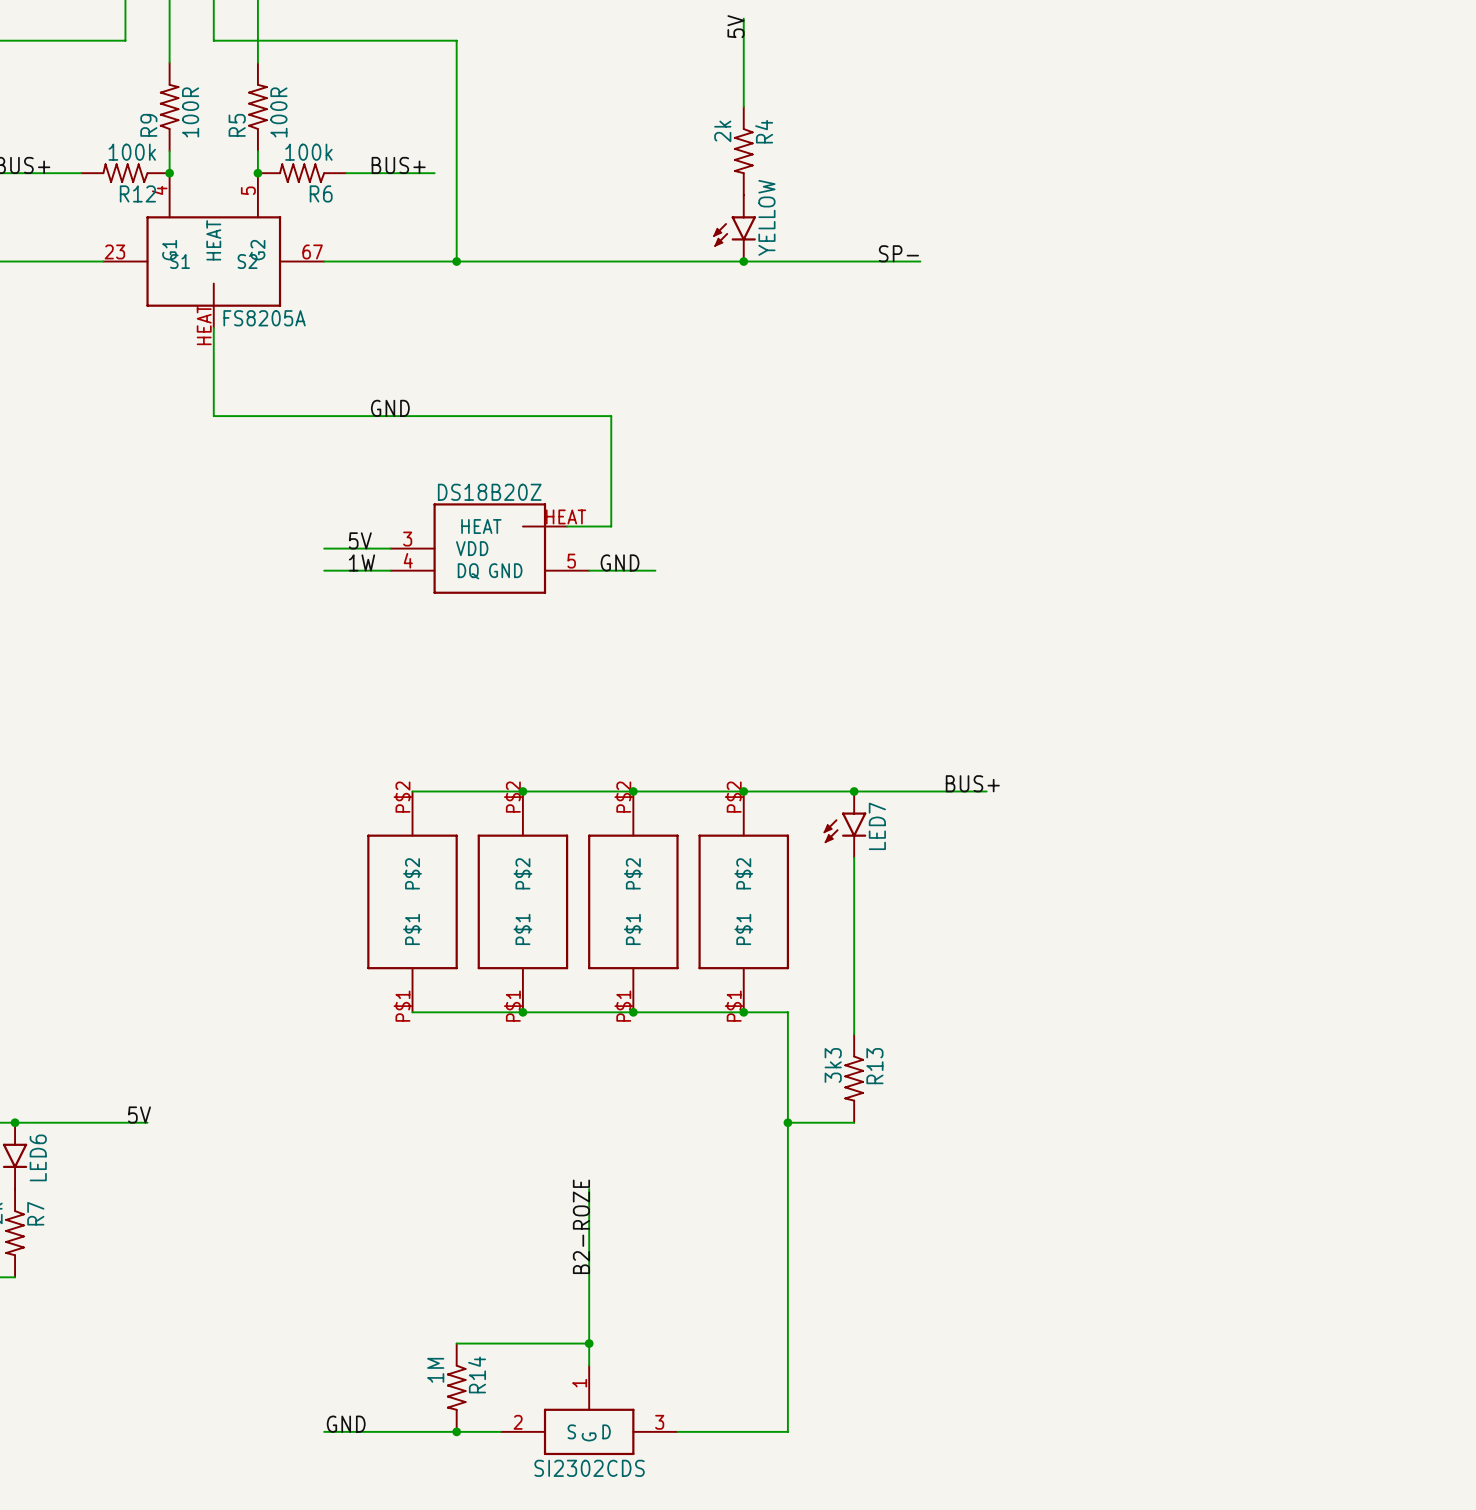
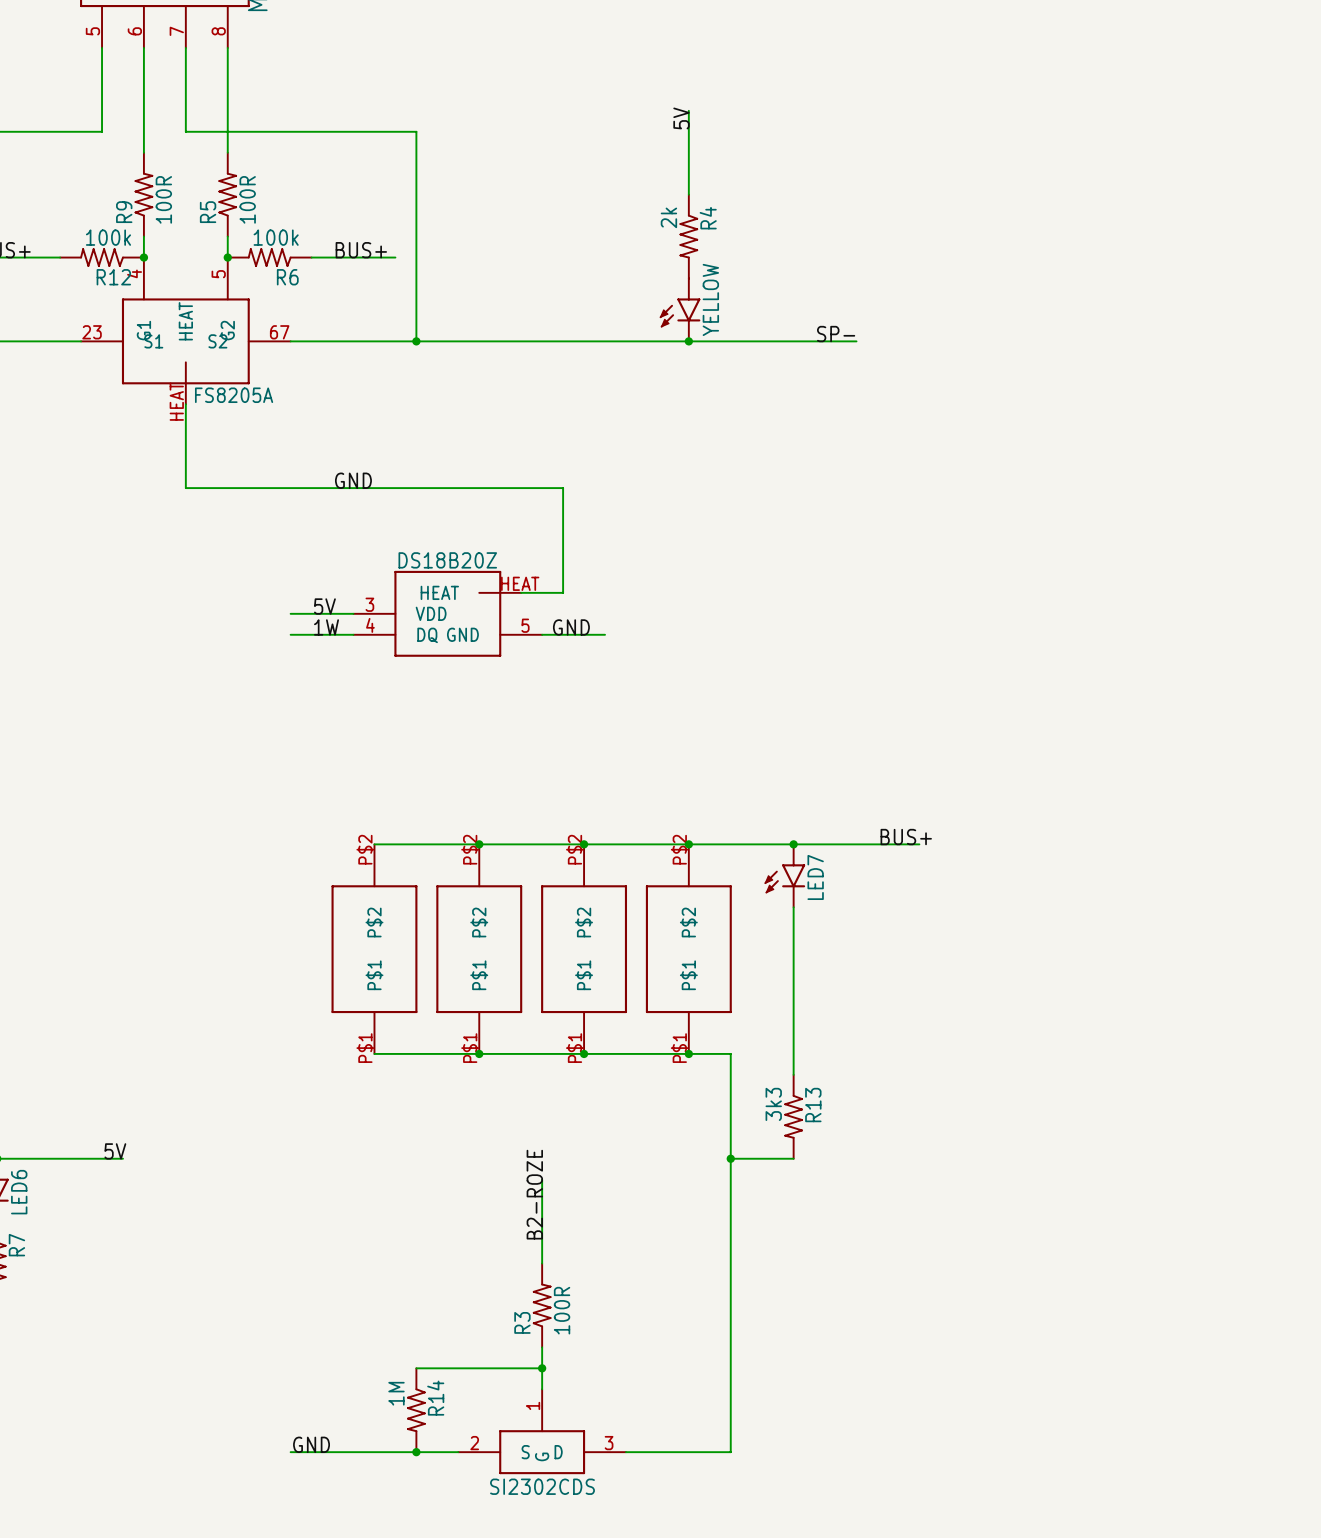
wire: none -> (542, 1179) (542, 1221)
label position: B2-ROZE (581, 1226) -> B2-ROZE (534, 1194)
R3: none -> 100R (542, 1305)

